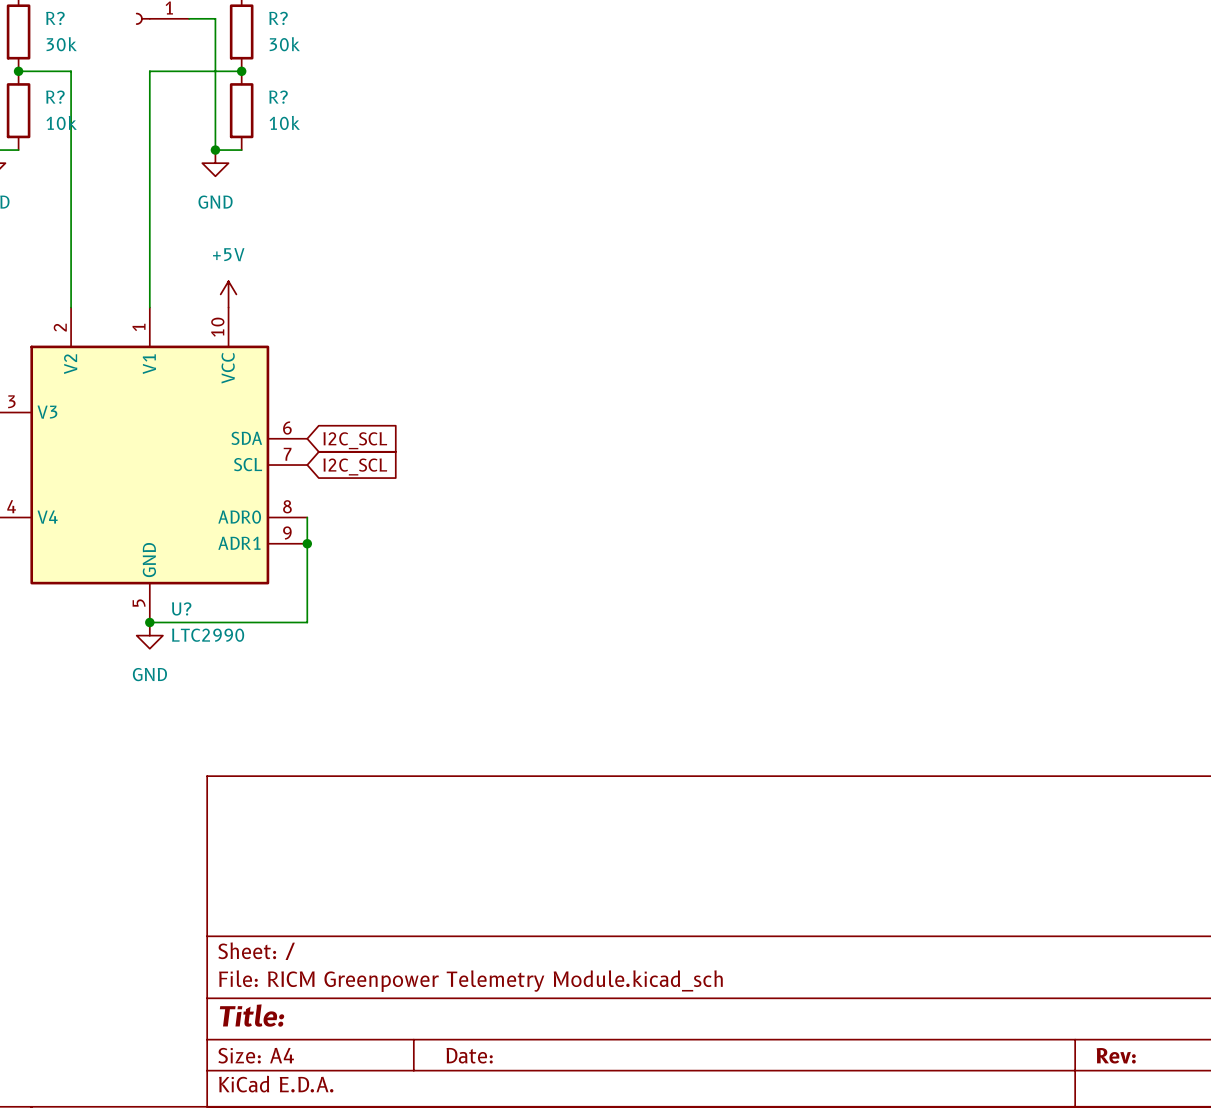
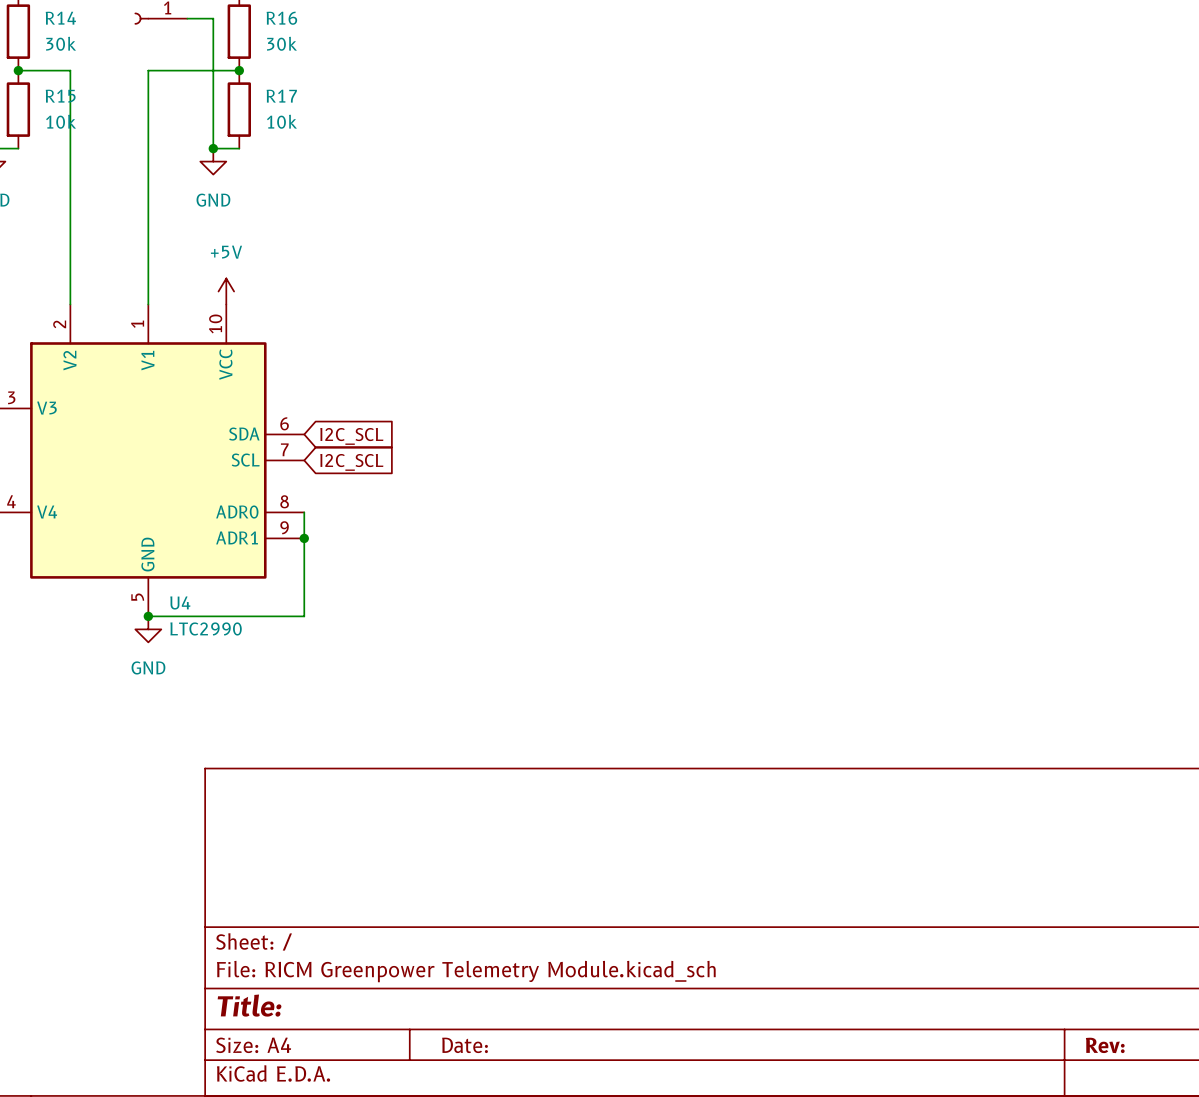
R? name: R? (55, 18) -> R14 (60, 18)
R? name: R? (278, 18) -> R16 (281, 18)
R? name: R? (55, 97) -> R15 (60, 96)
R? name: R? (278, 97) -> R17 (281, 96)
U? name: U? (181, 608) -> U4 (180, 602)

